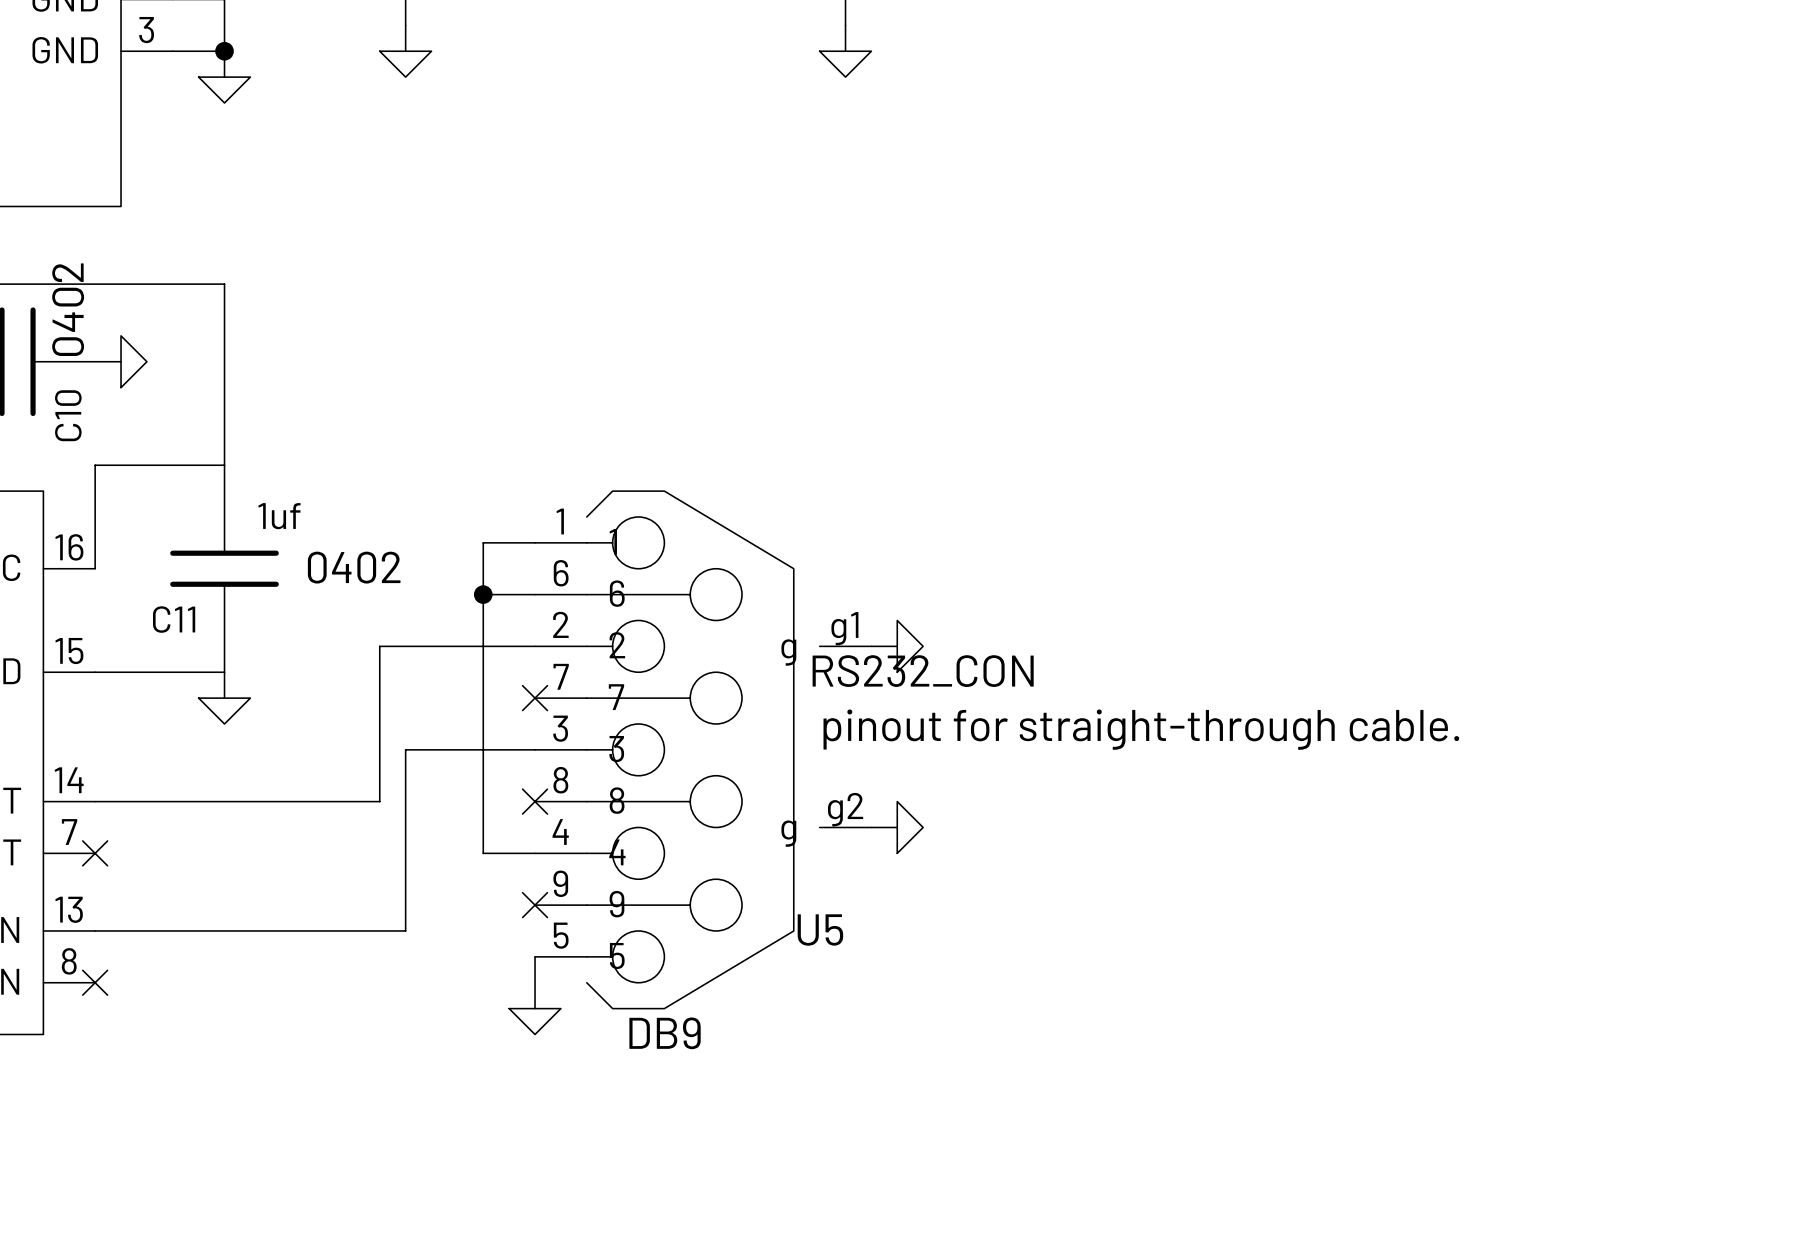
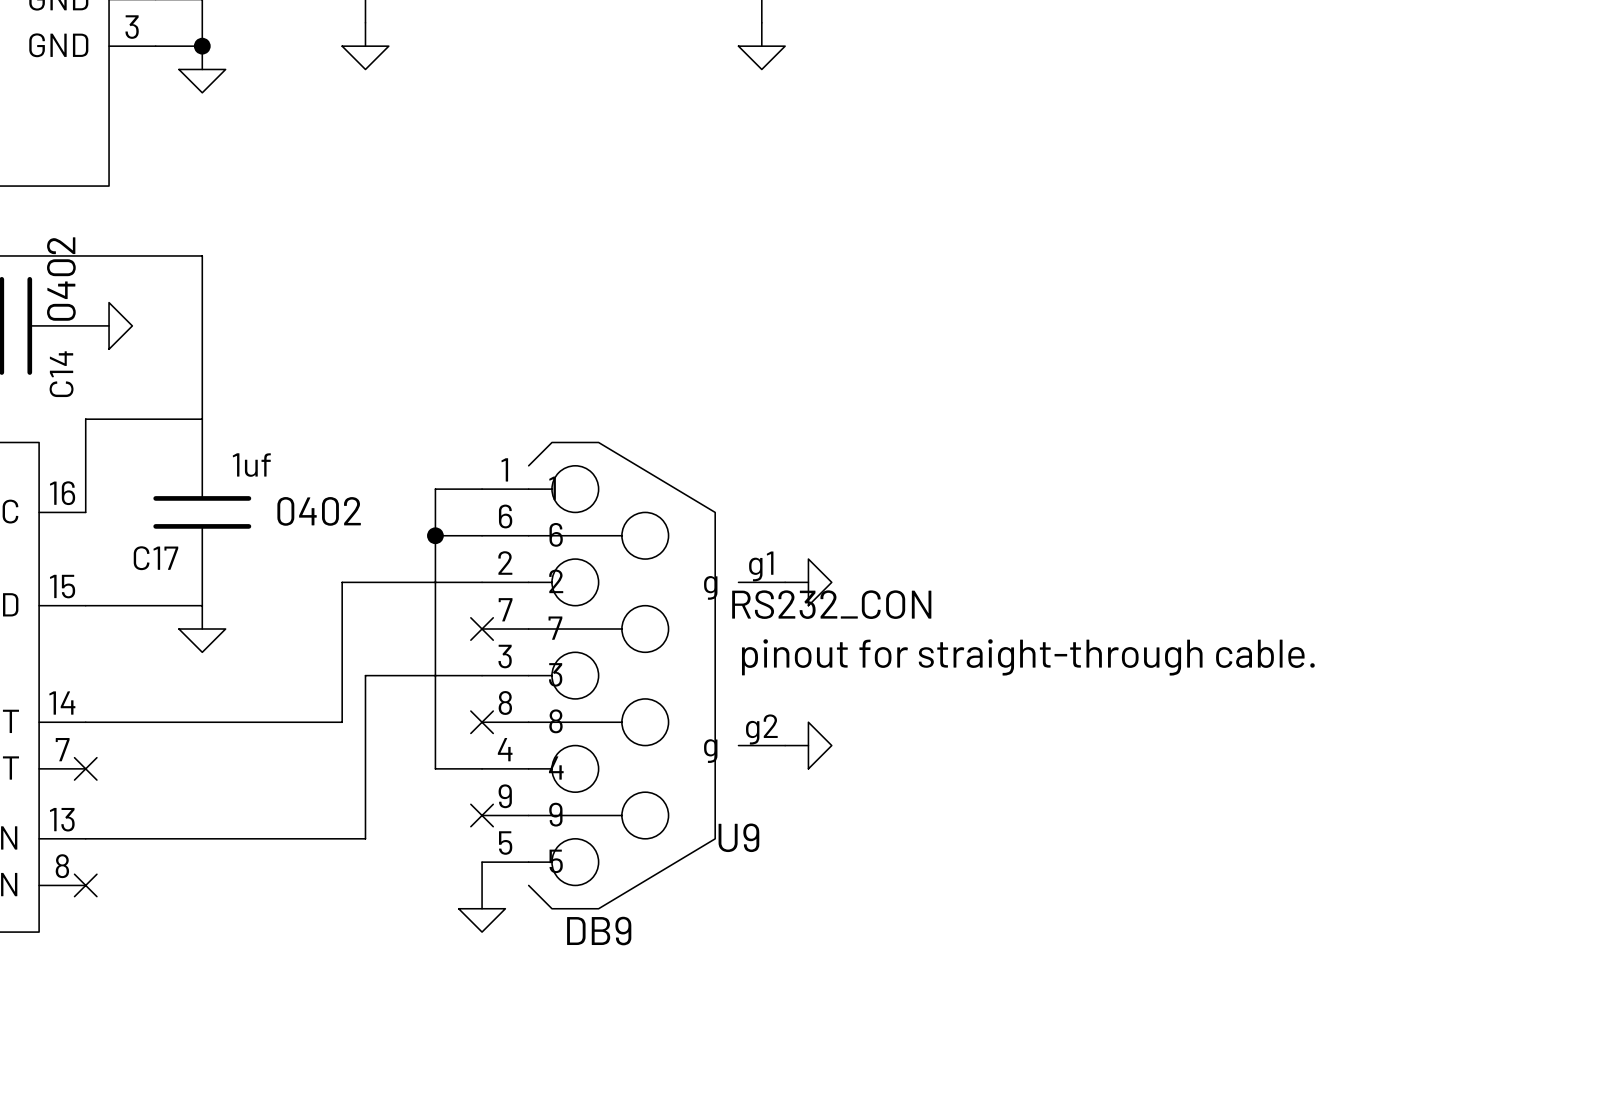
C10 name: C10 (68, 415) -> C14 (61, 374)
C11 name: C11 (174, 619) -> C17 (155, 558)
U5 name: U5 (820, 930) -> U9 (738, 837)

